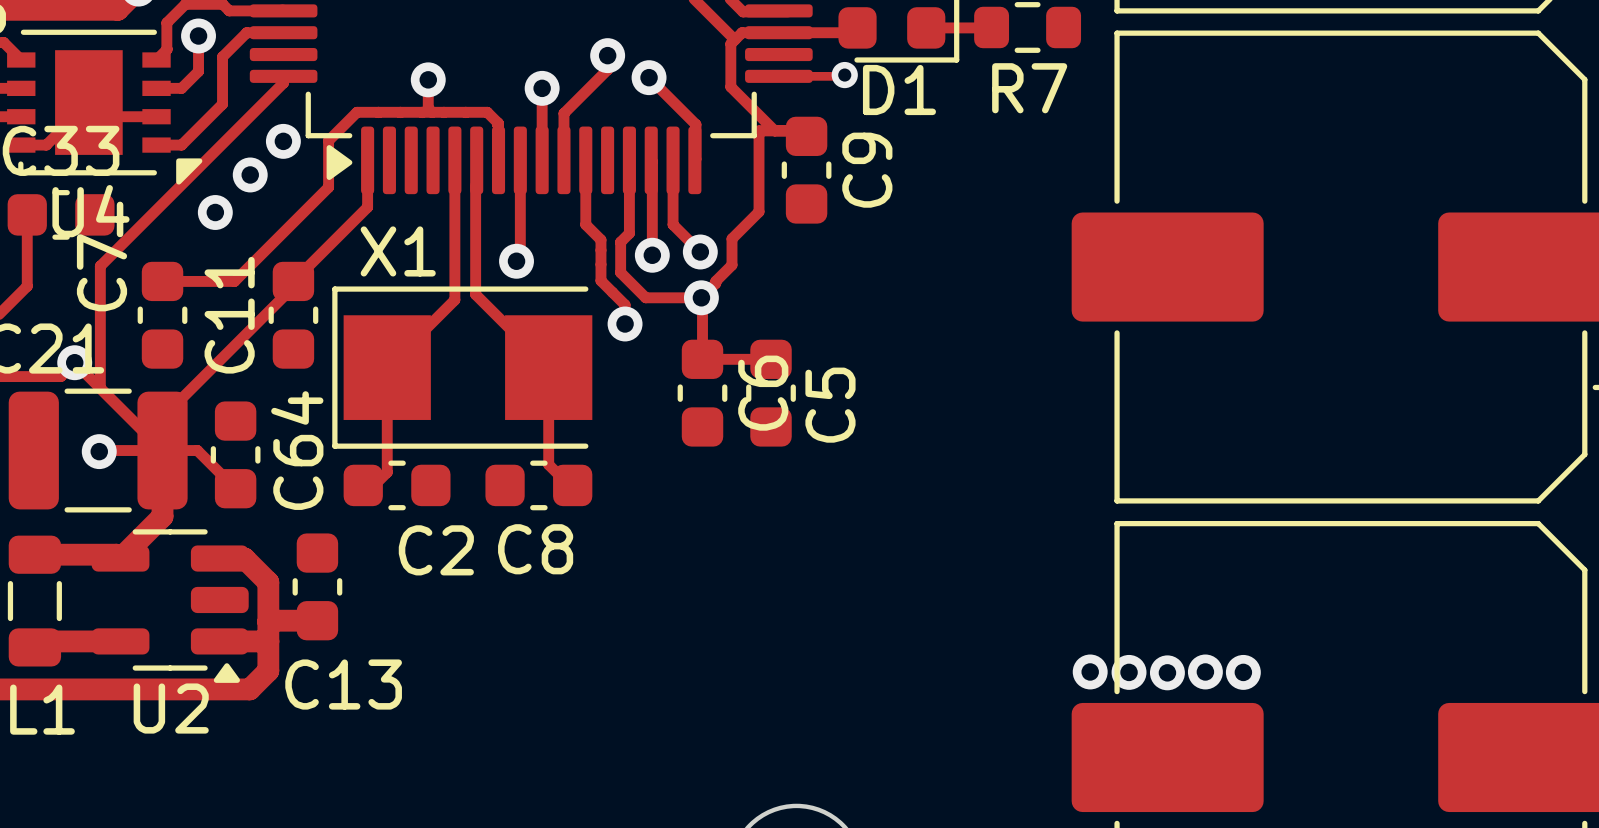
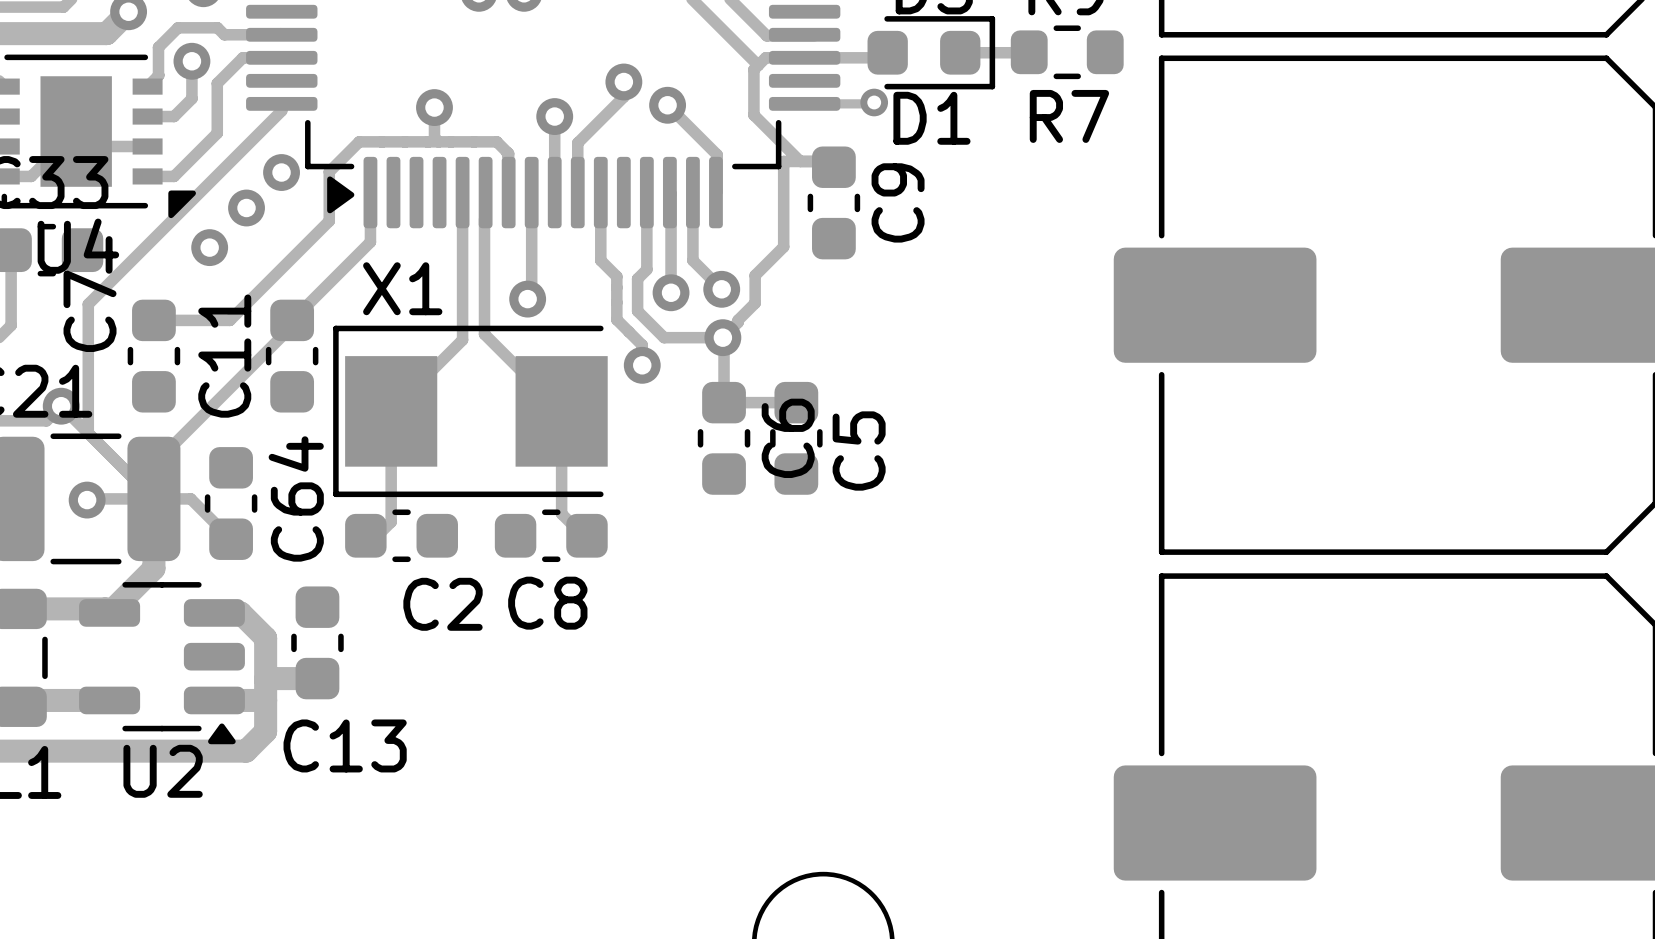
via: (1090, 671) -> none
via: (1205, 671) -> none
via: (1129, 672) -> none
via: (1167, 672) -> none
via: (1243, 672) -> none

